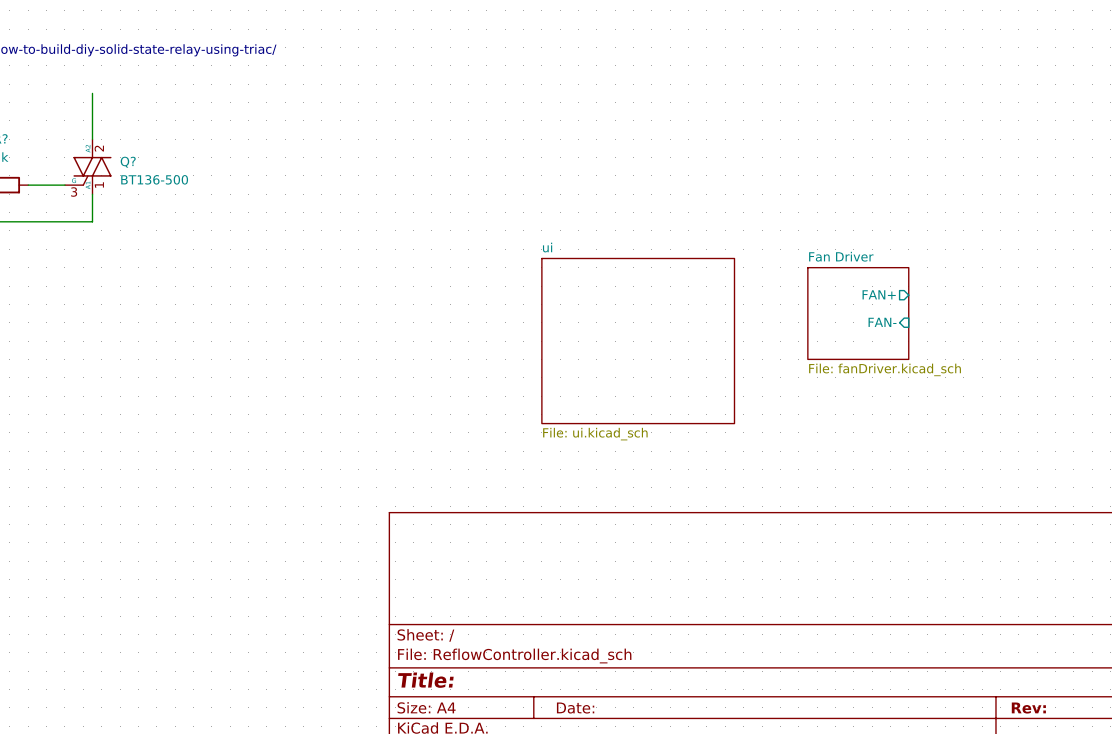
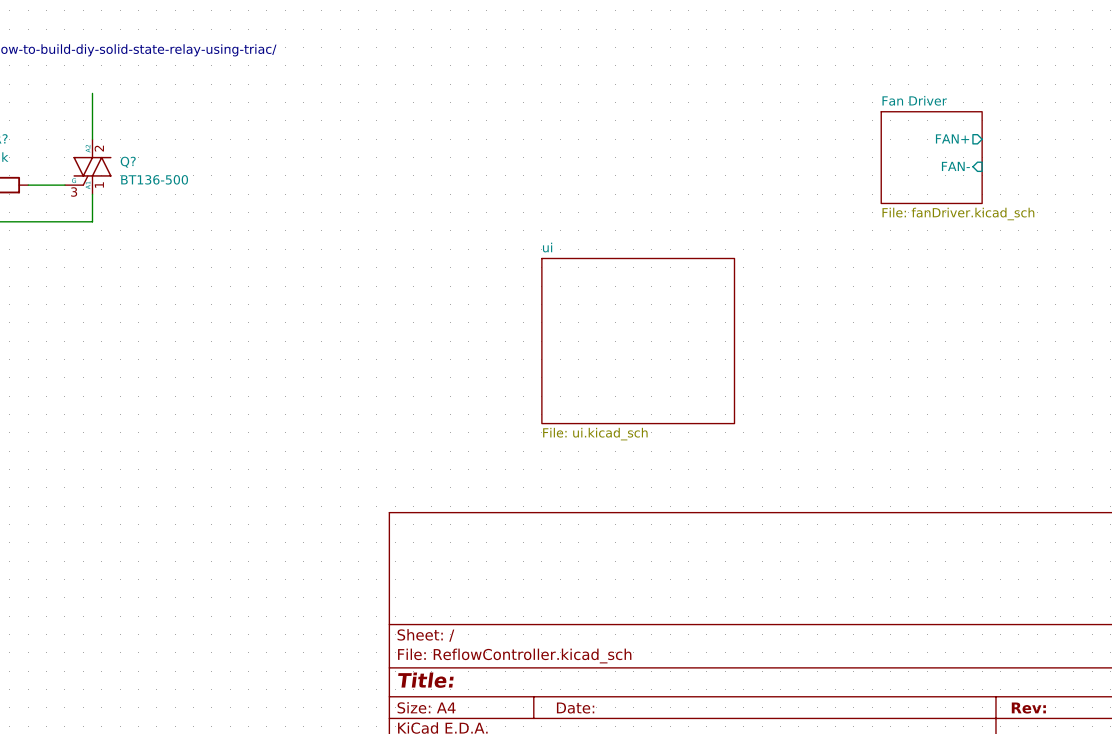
sheet pin position: FAN+ (879, 294) -> FAN+ (952, 138)
sheet Fan Driver position: (858, 313) -> (931, 157)
sheet pin position: FAN- (882, 322) -> FAN- (955, 166)

